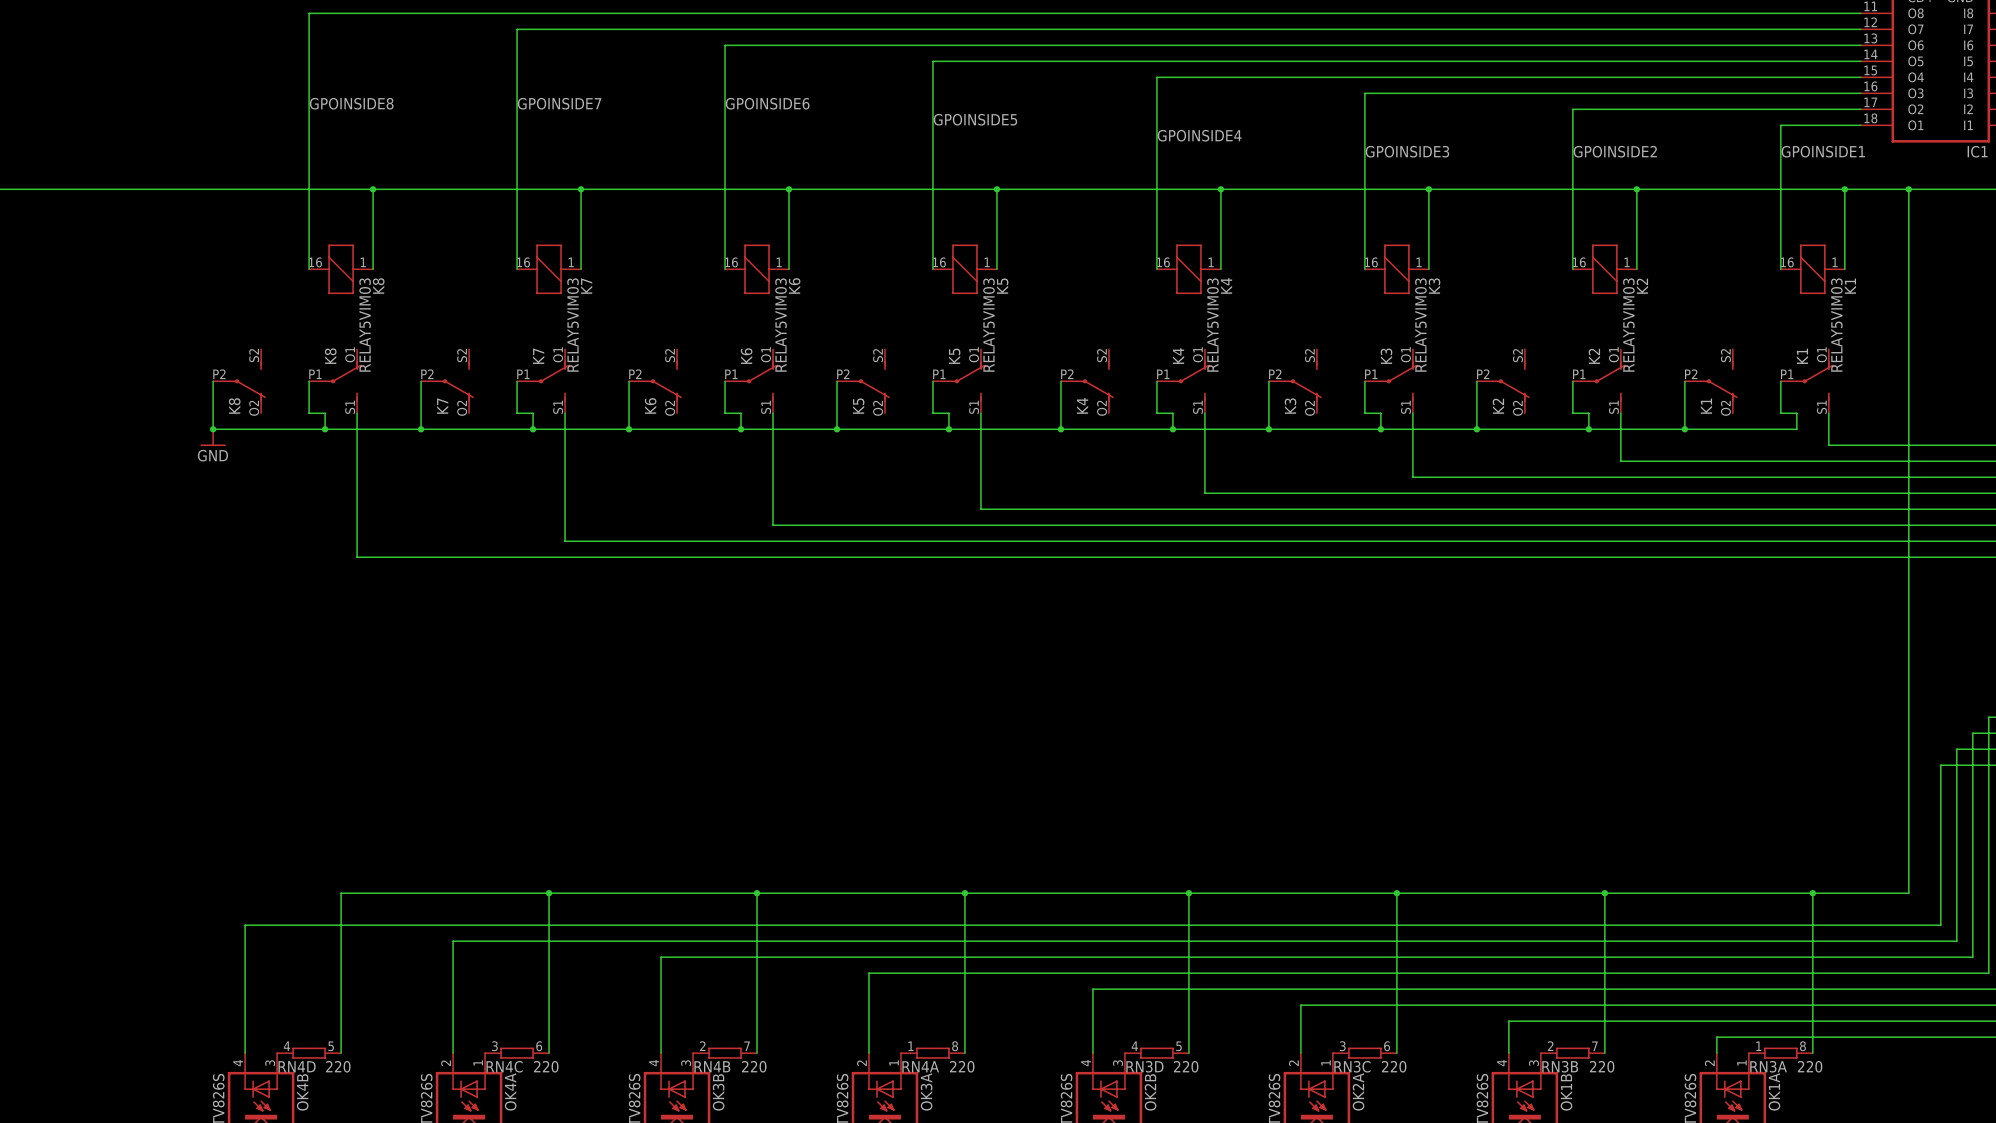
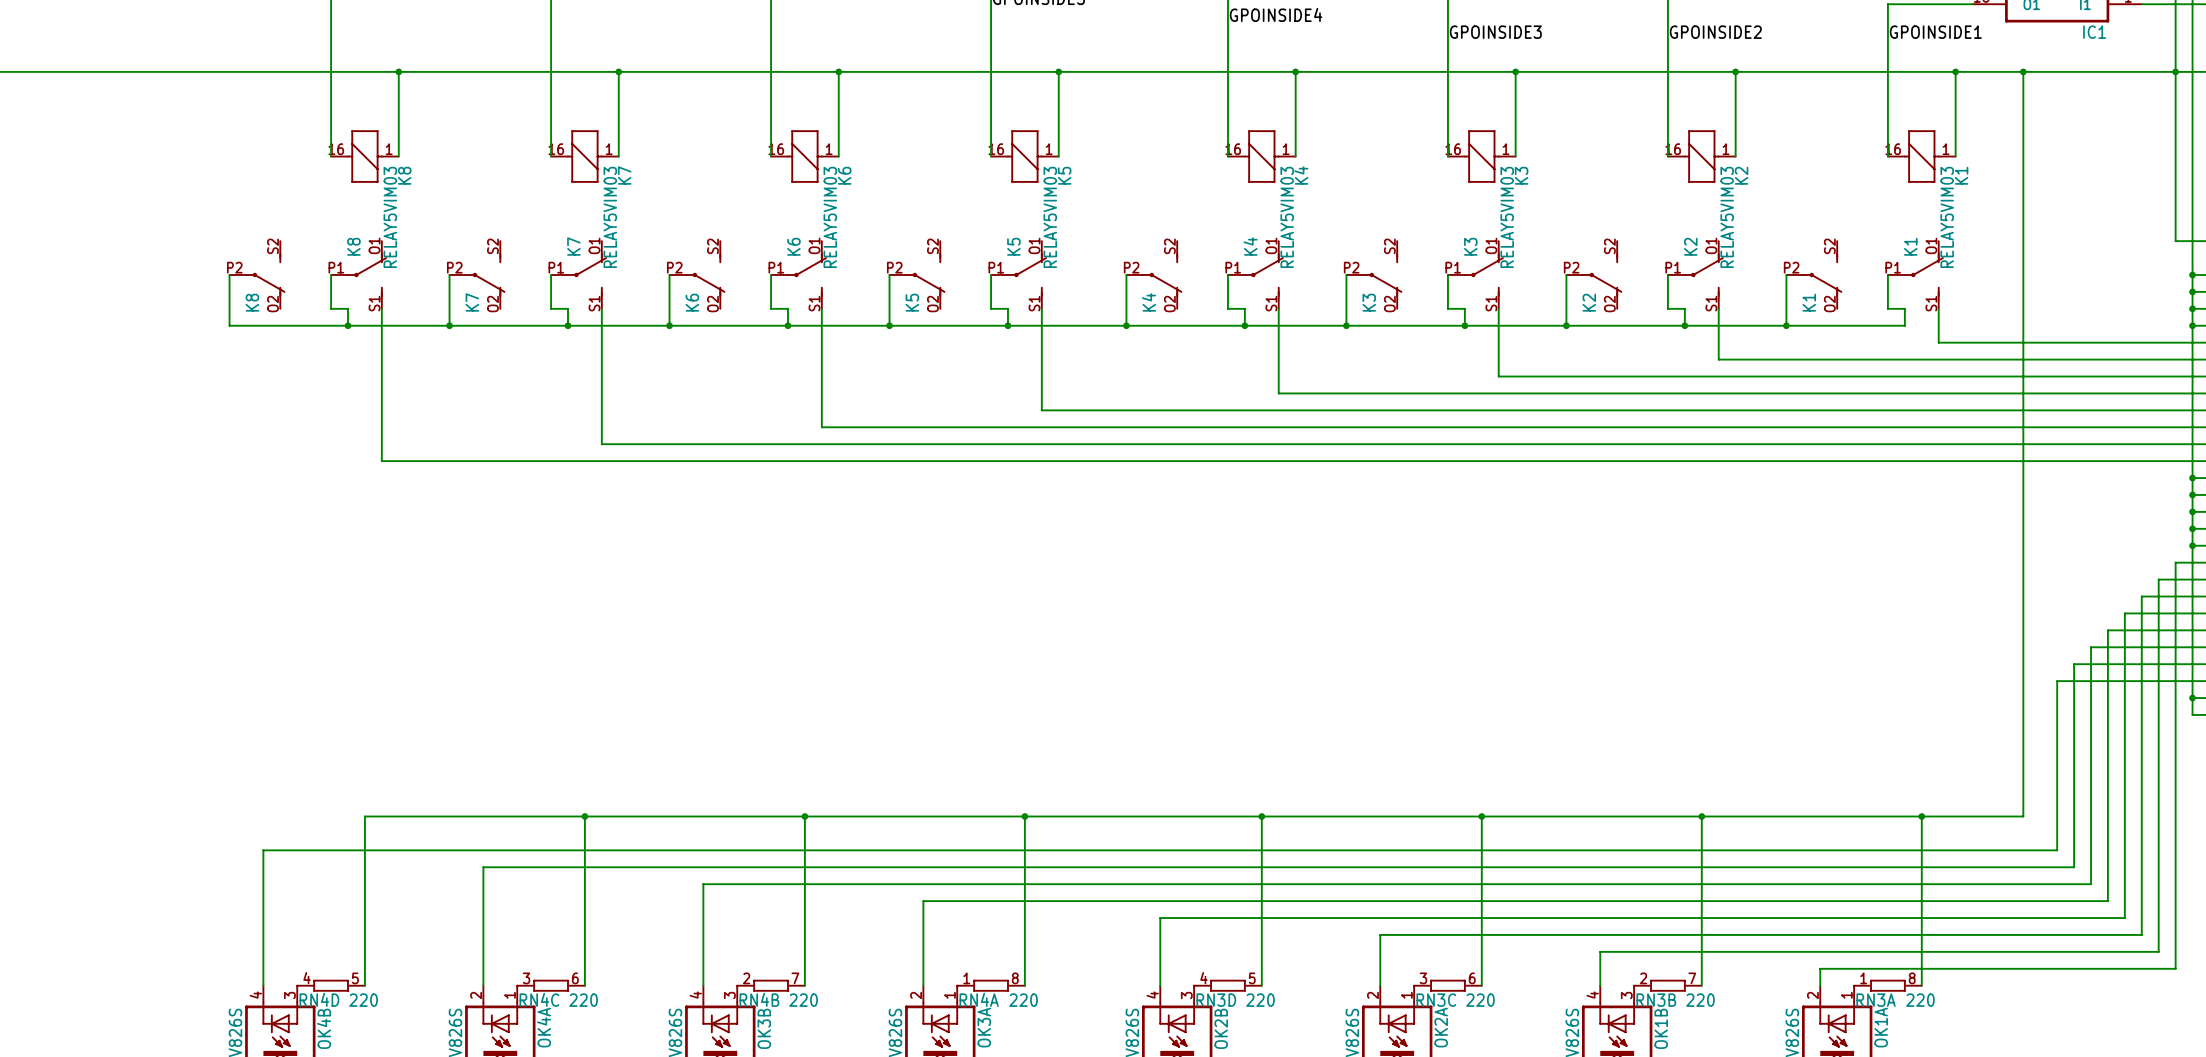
junction: (213, 429) -> none
power symbol: GND (213, 437) -> none

